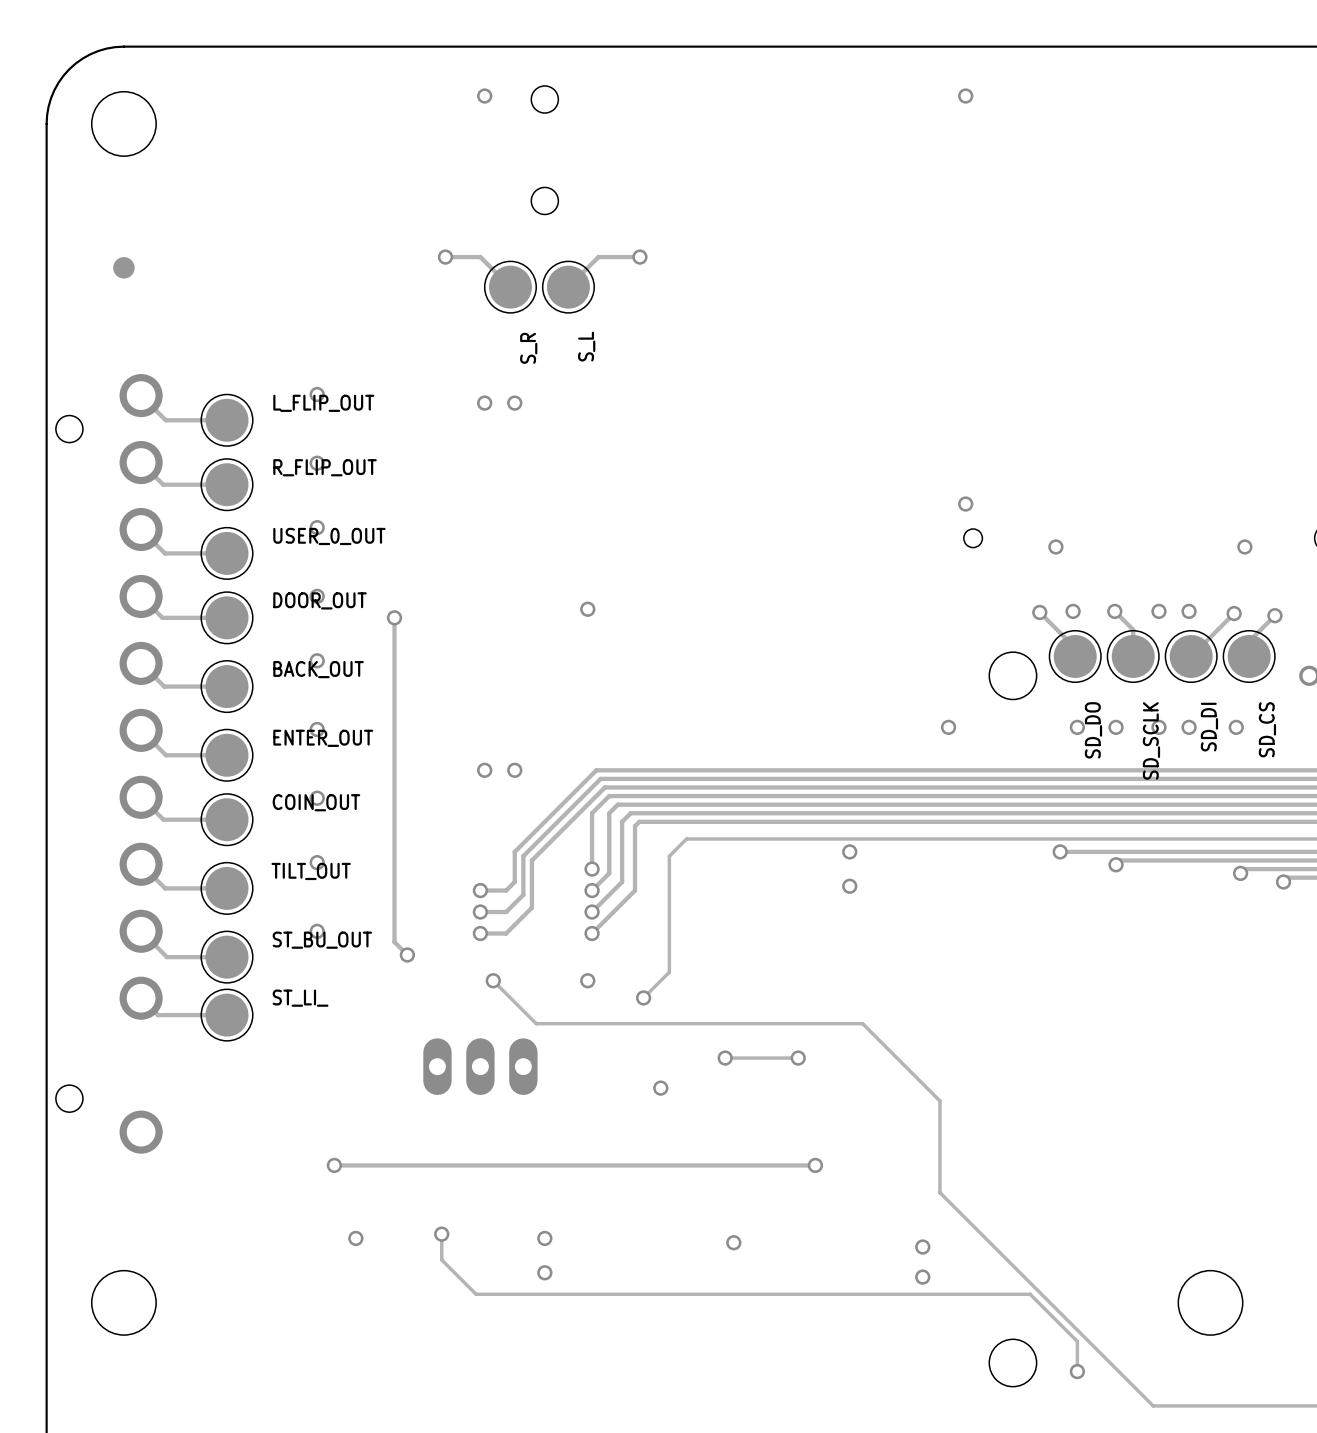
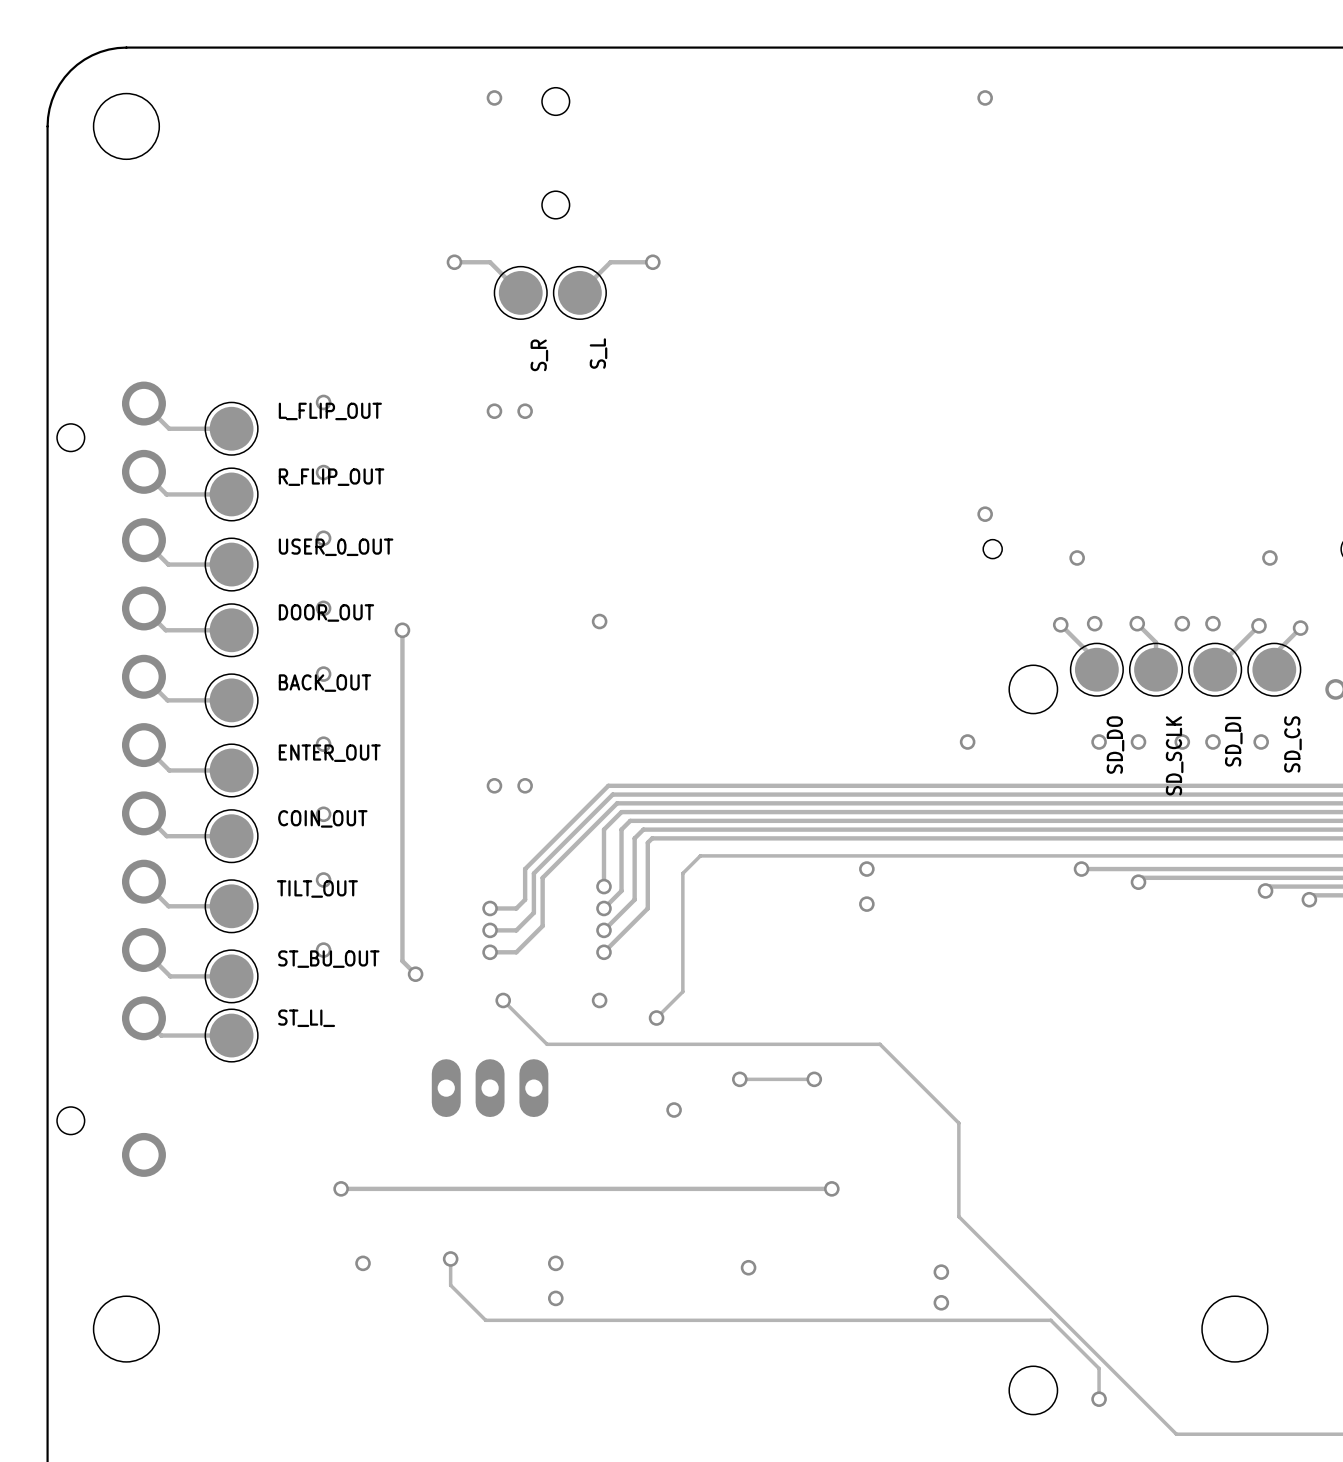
part: (123, 267) -> none

